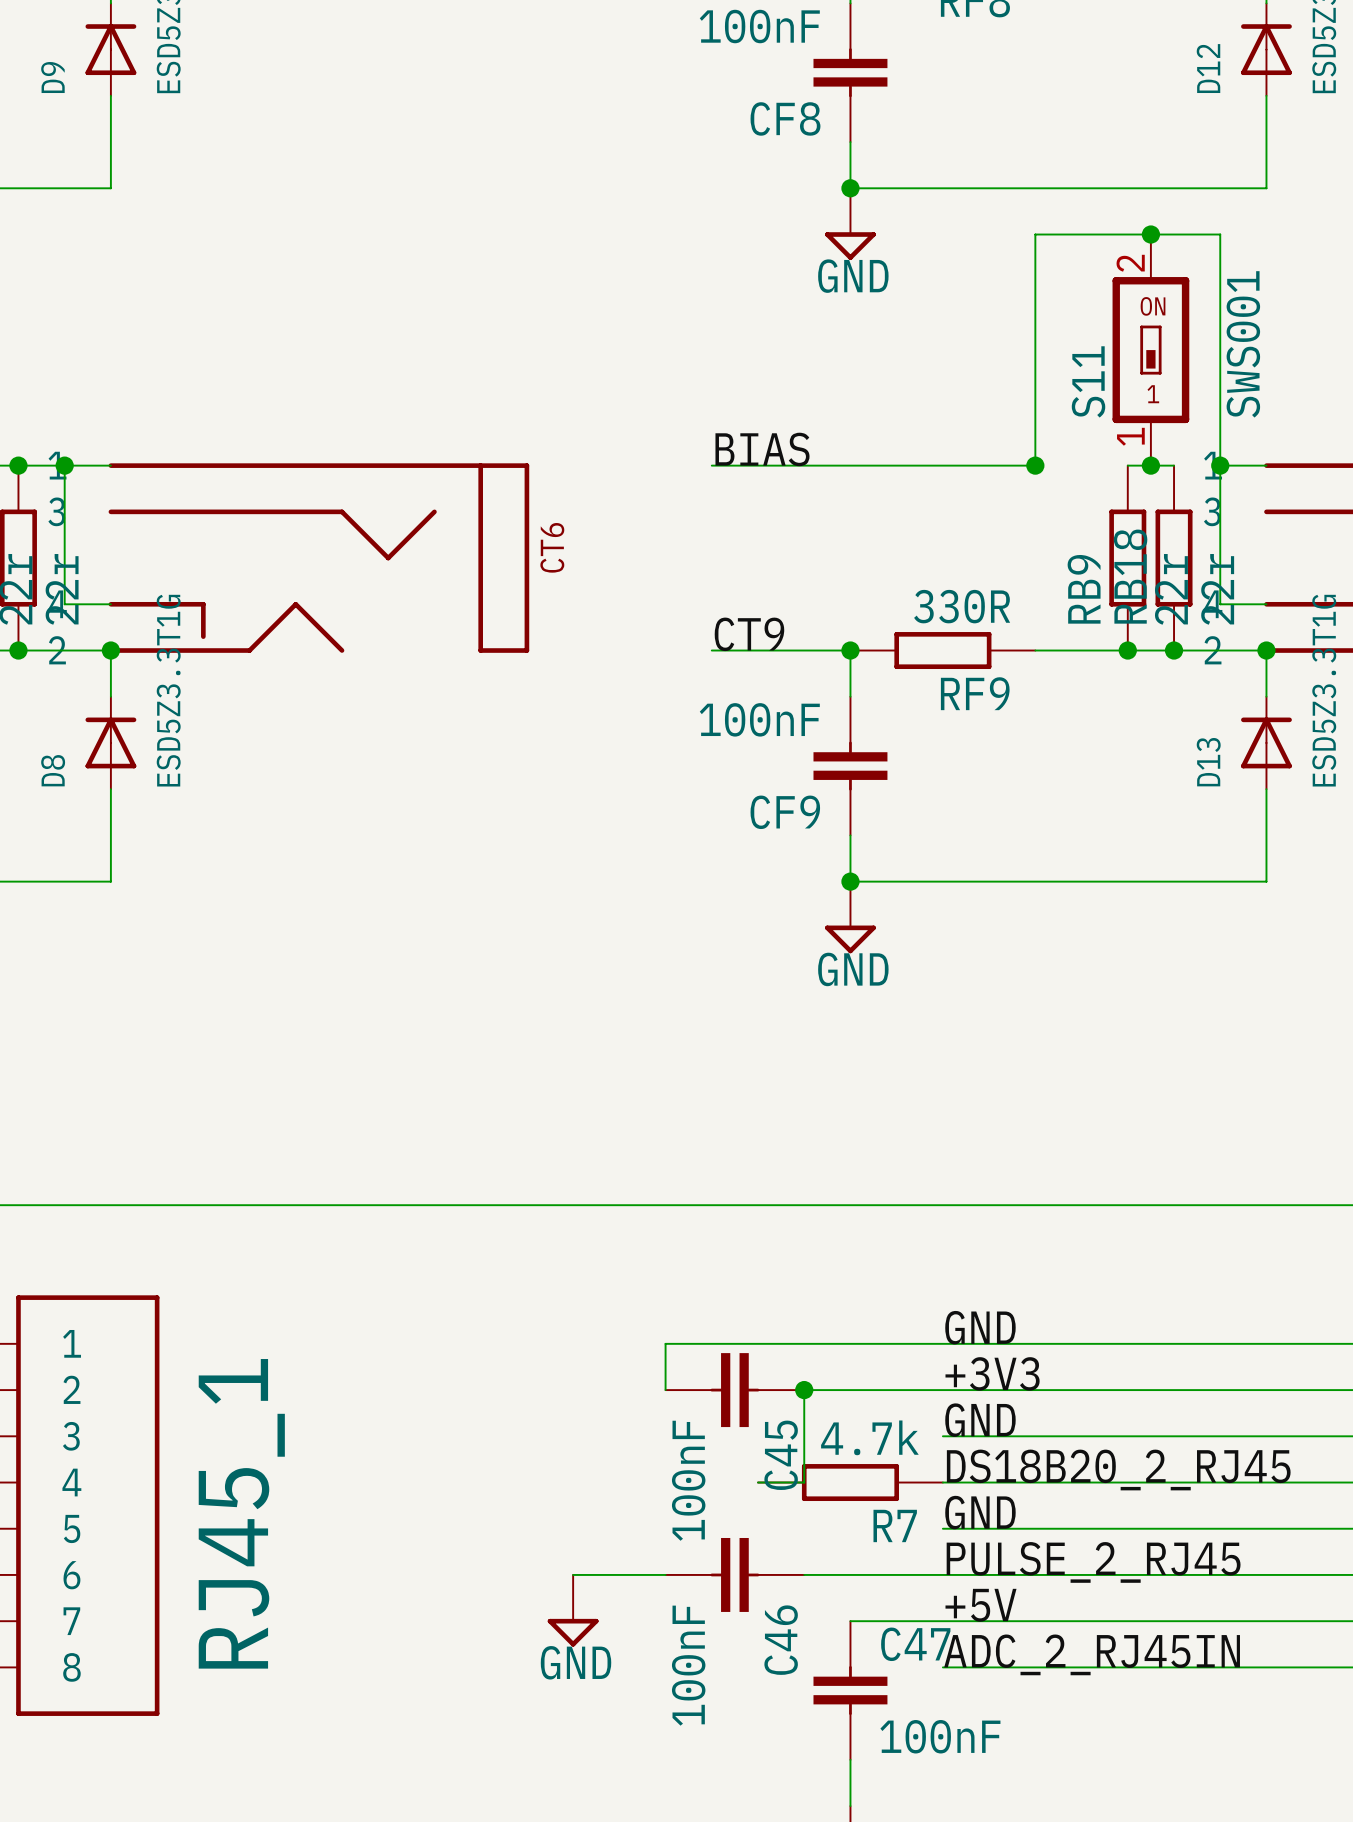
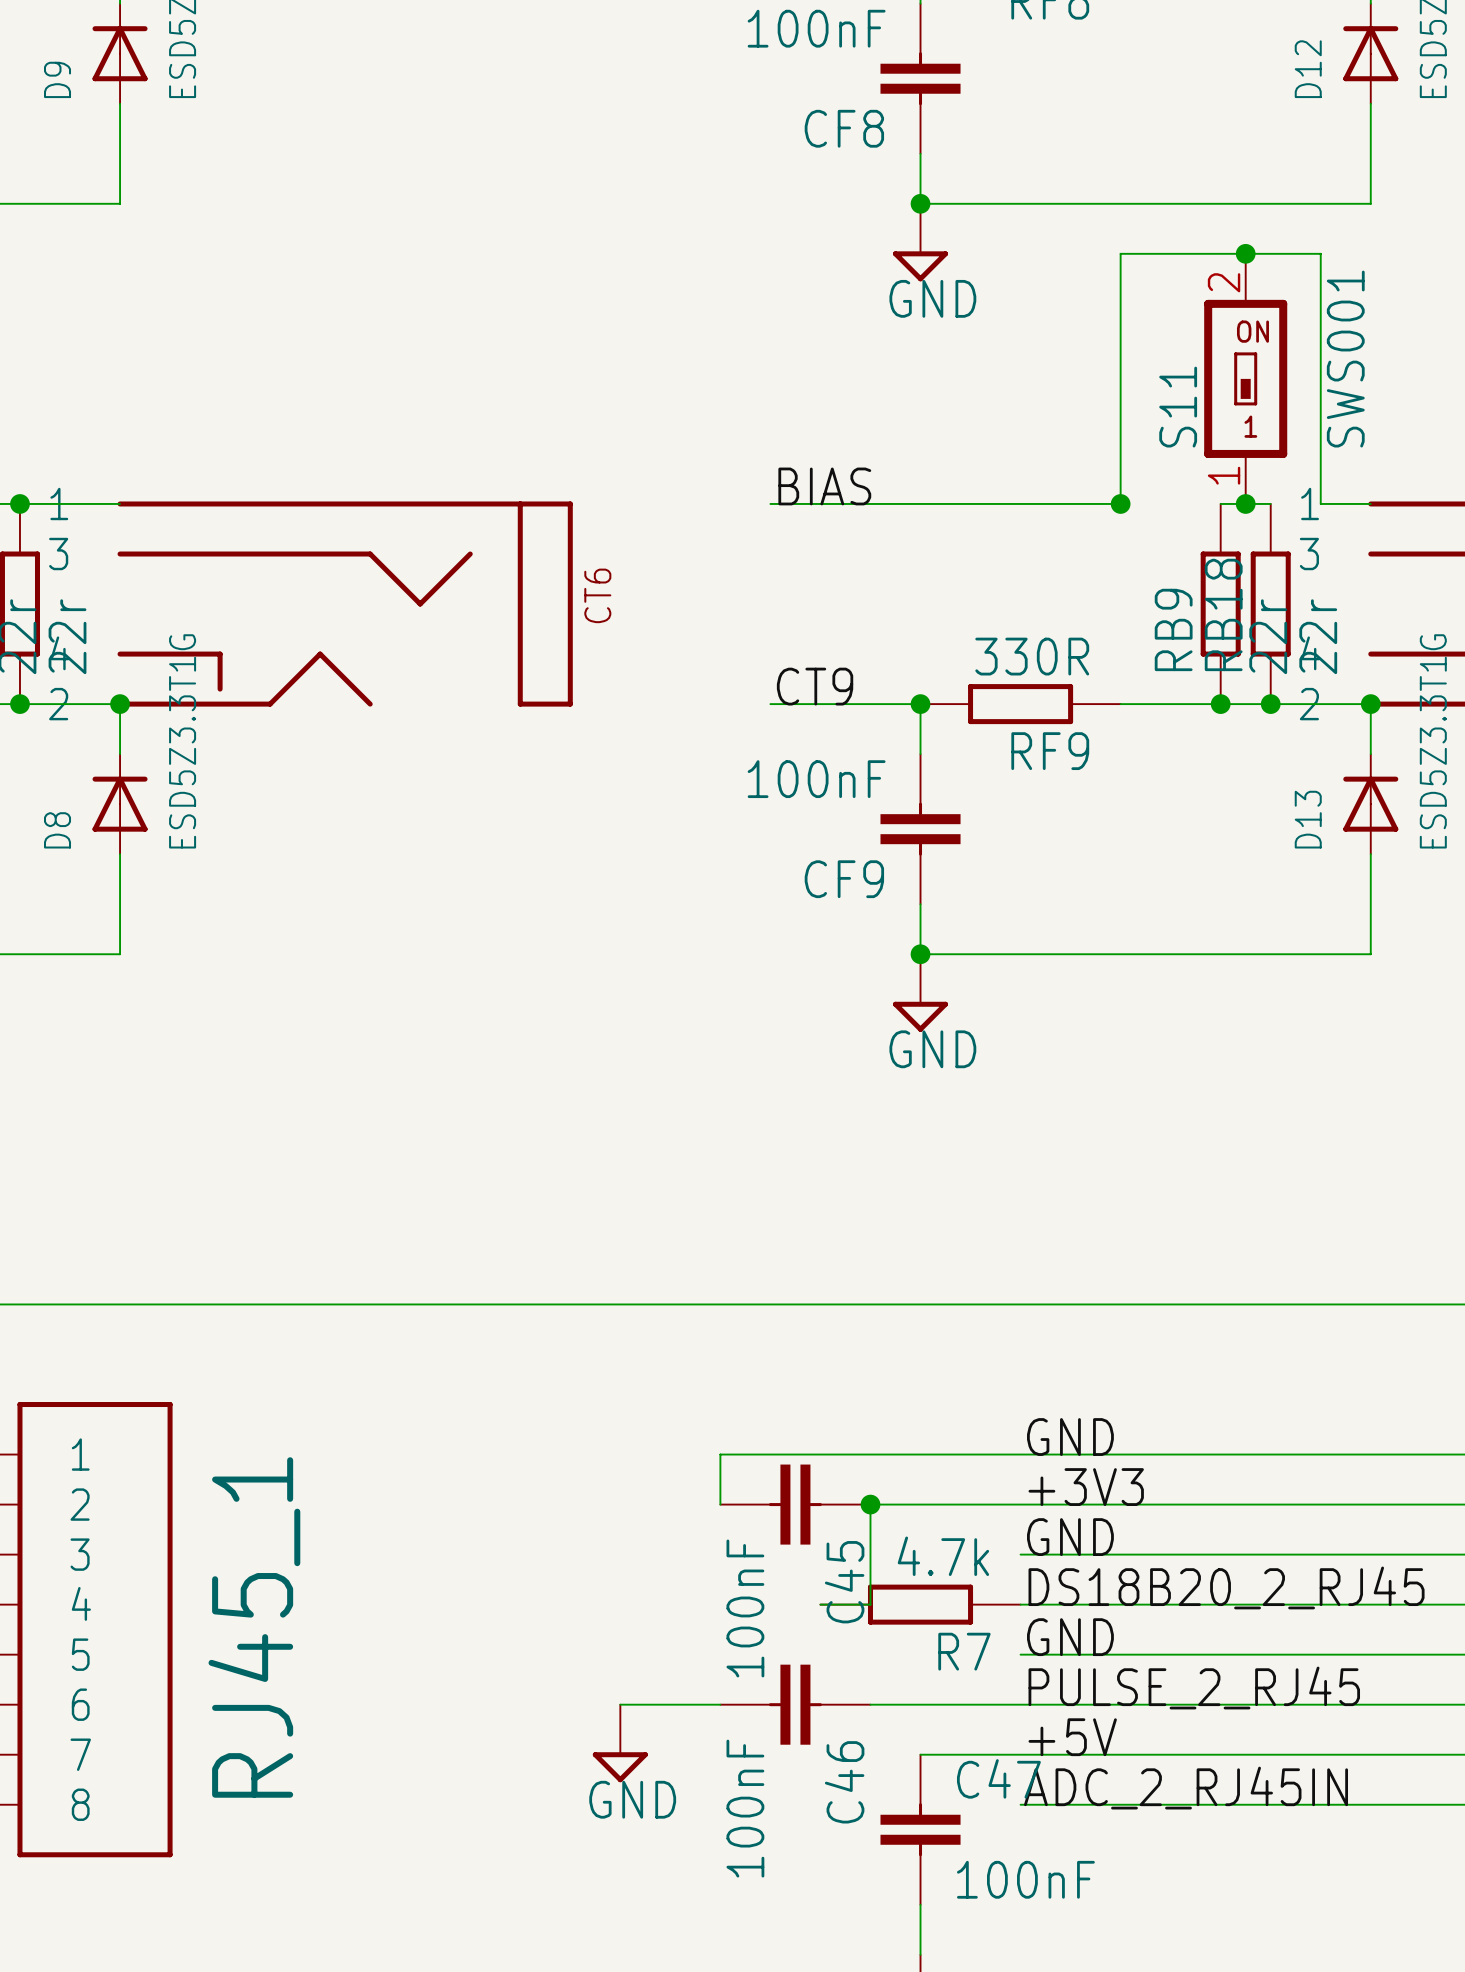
wire: (64, 465) (64, 604) (110, 604) -> none
junction: (64, 465) -> none
wire: (1220, 465) (1220, 604) (1266, 604) -> none
junction: (1220, 465) -> none

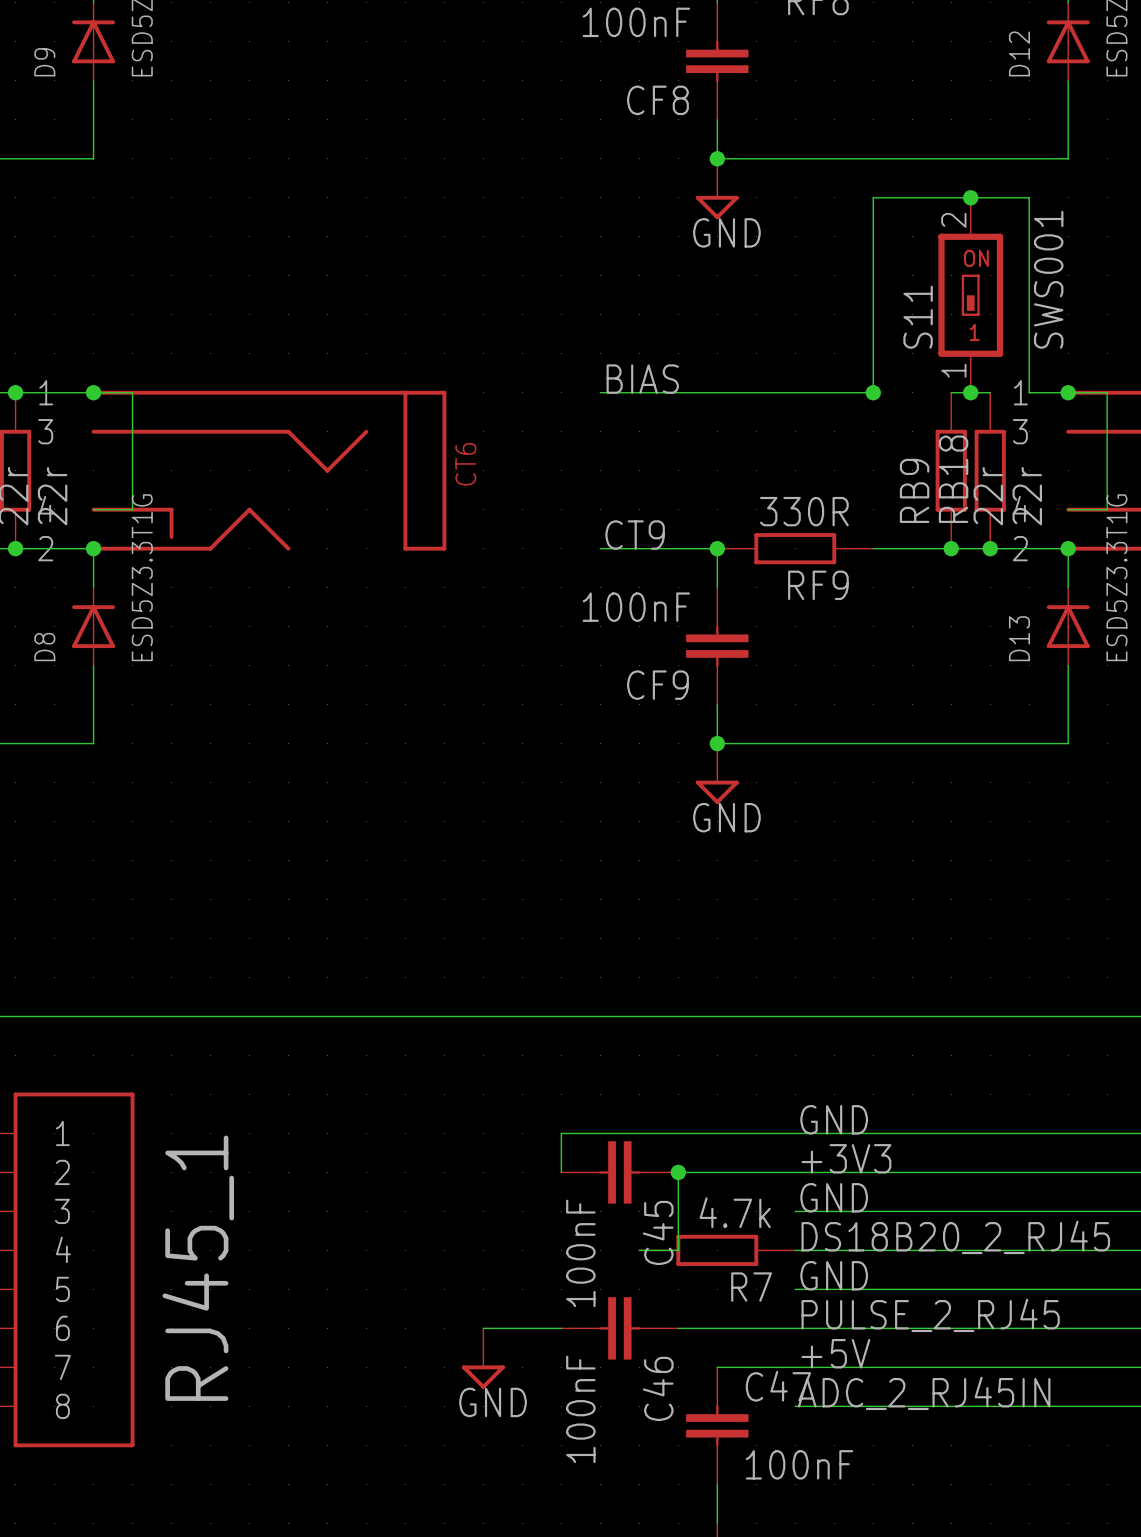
wire: none -> (93, 392) (132, 392) (132, 509) (93, 509)
junction: none -> (93, 392)
wire: none -> (1068, 392) (1107, 392) (1107, 509) (1068, 509)
junction: none -> (1068, 392)

